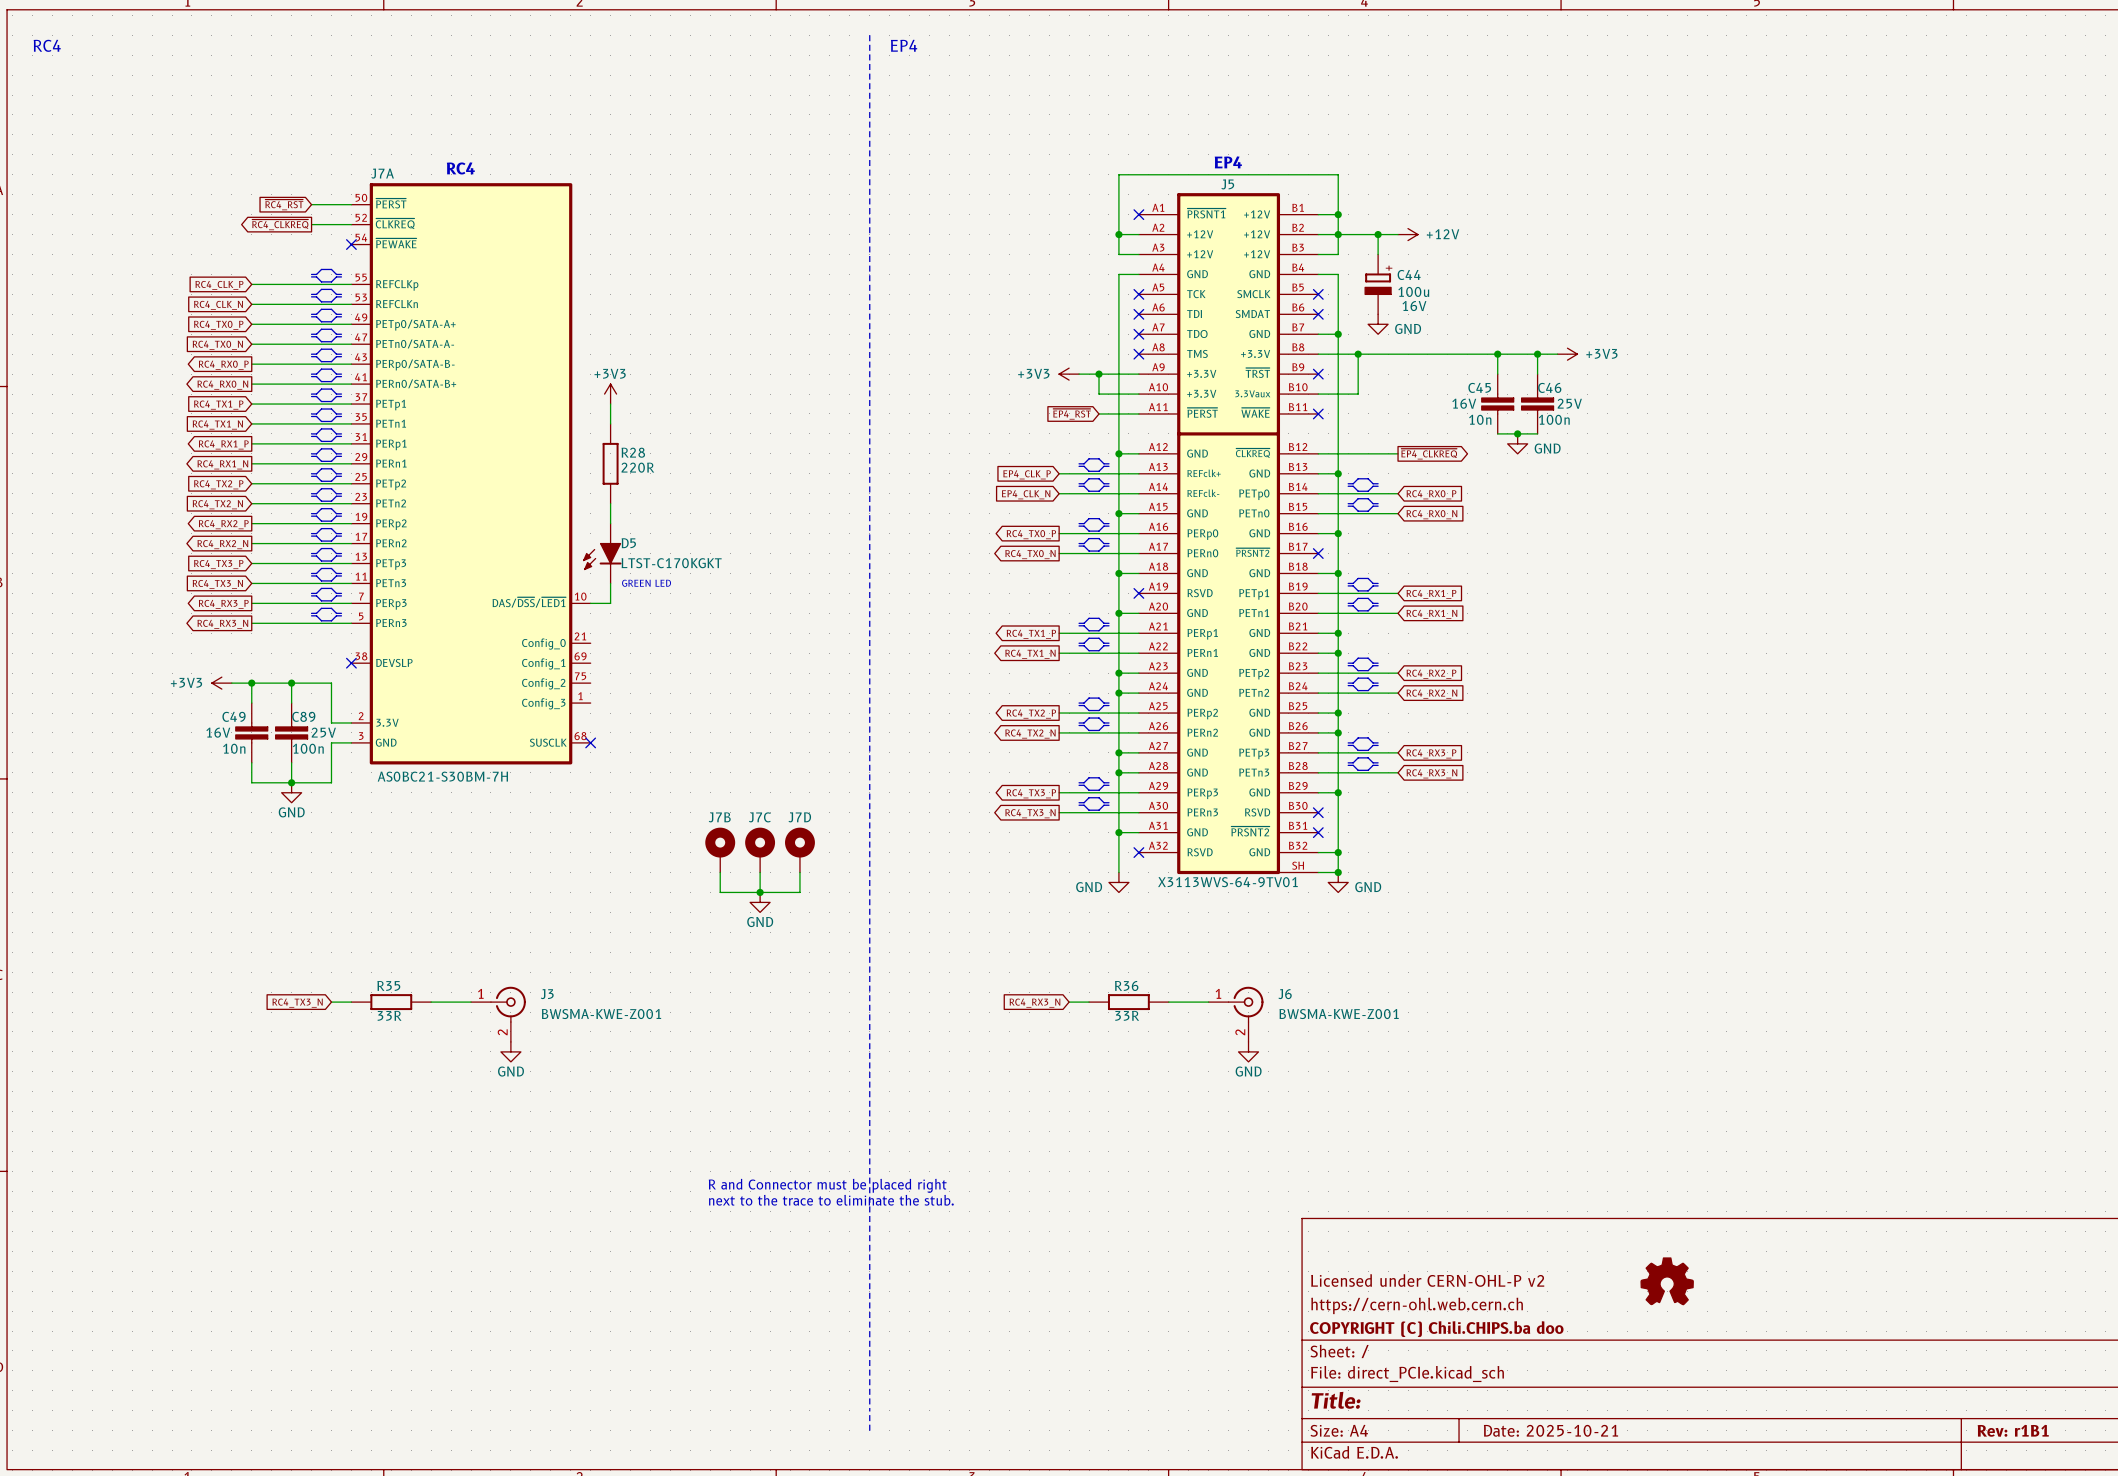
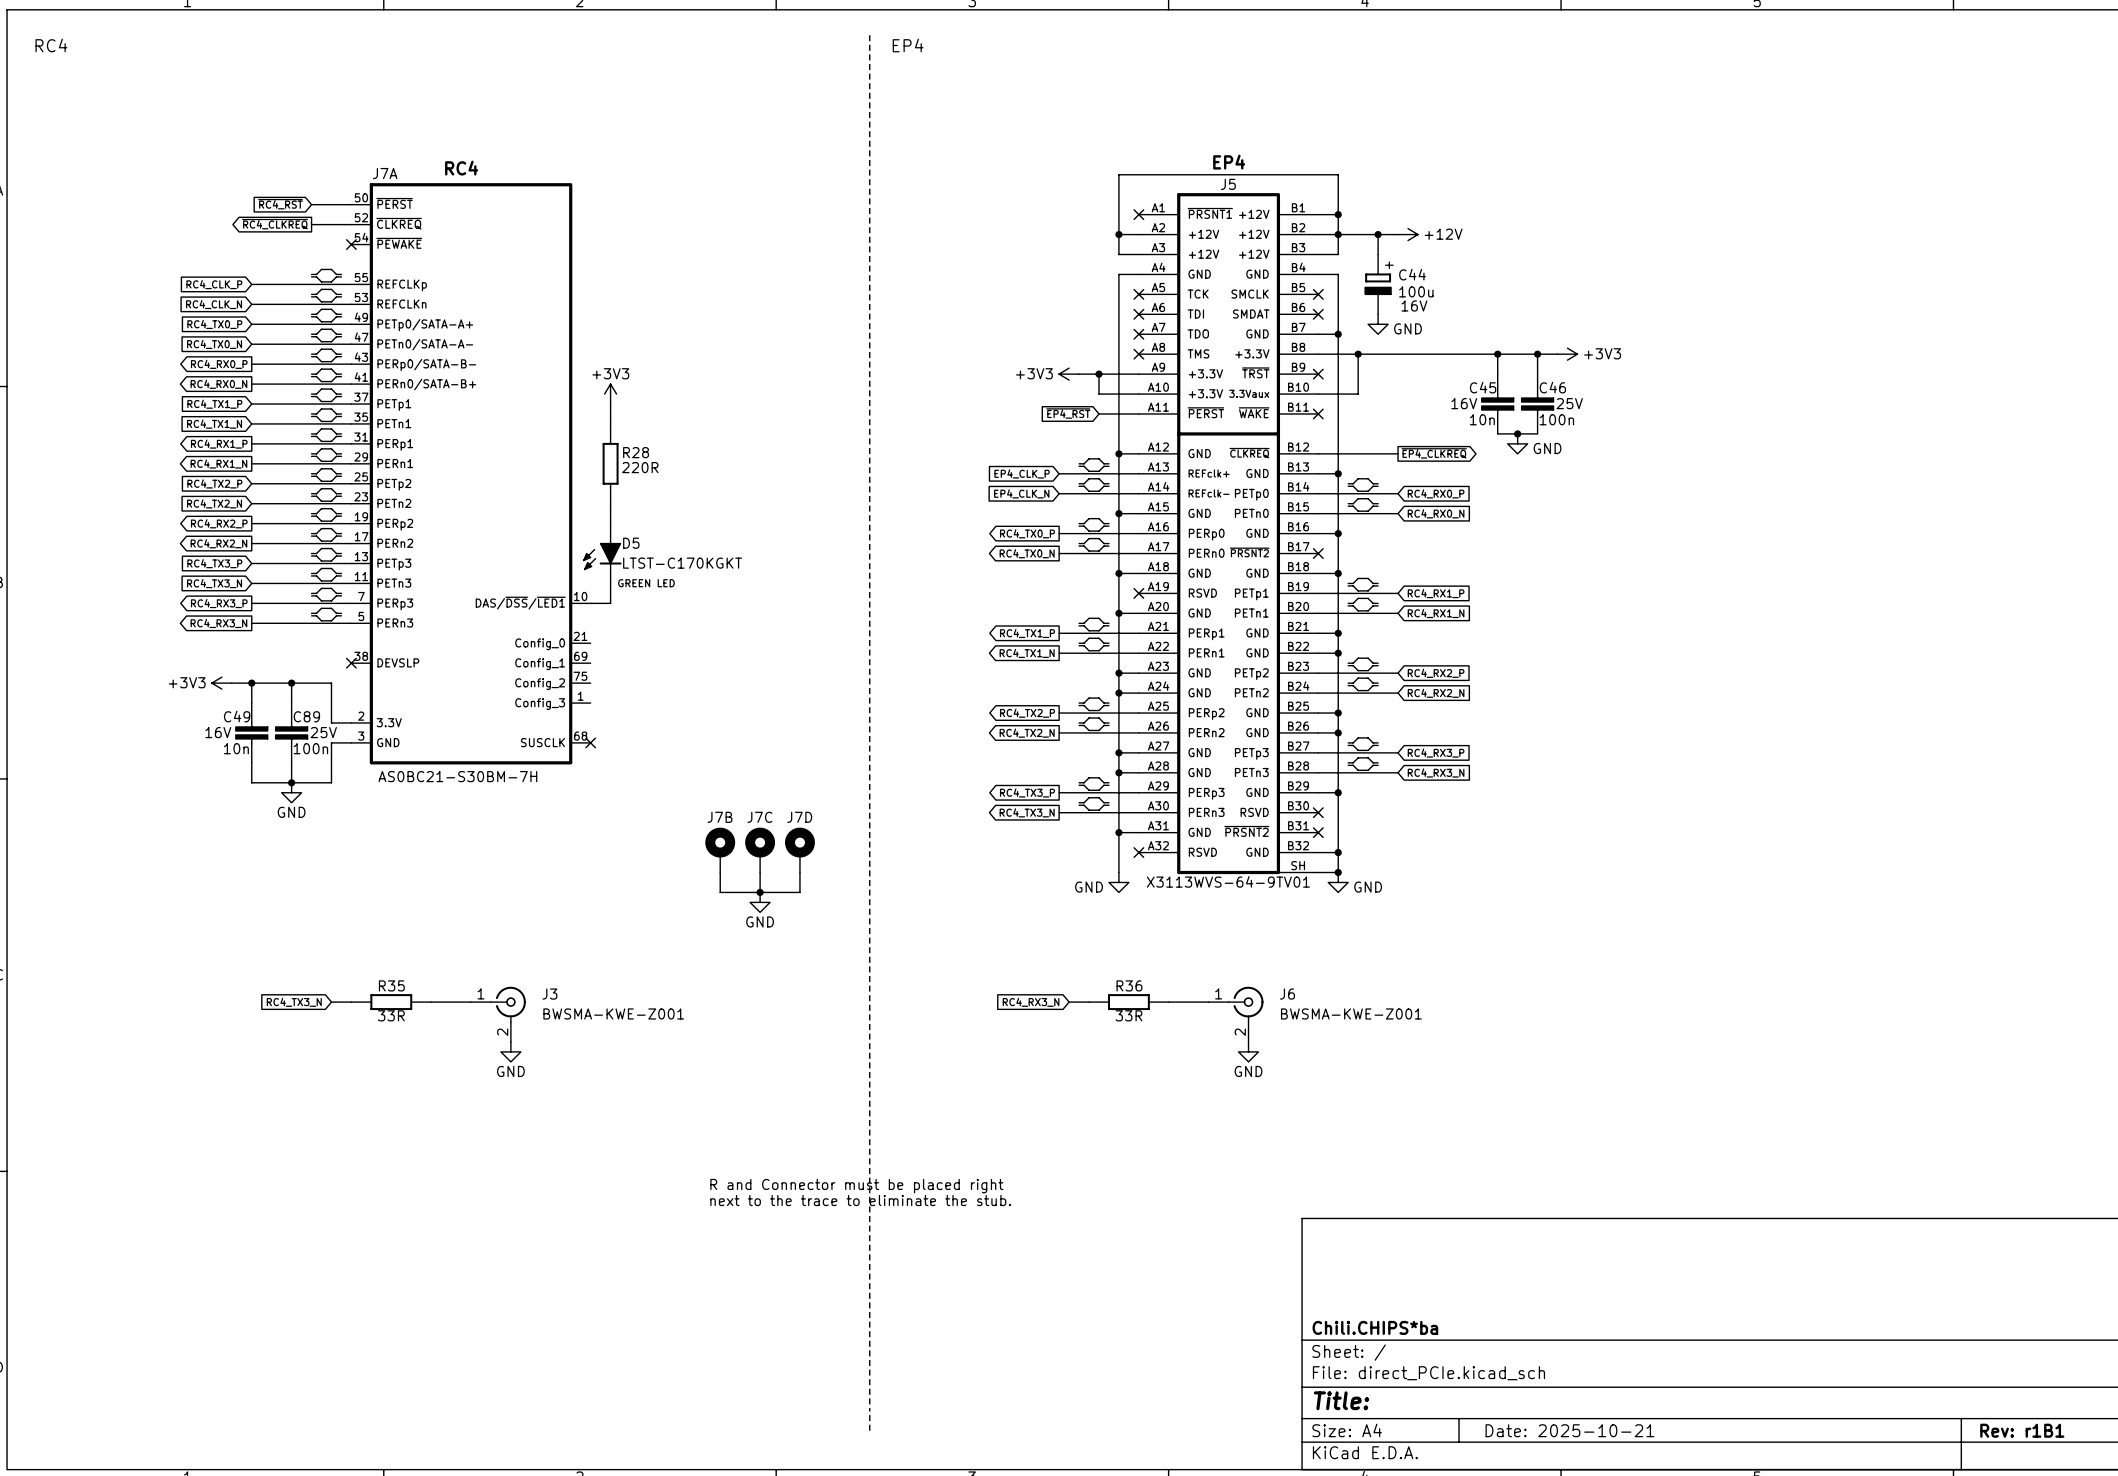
title block: Licensed under CERN-OHL-P v2 (1427, 1280) -> none
part: (1667, 1281) -> none
title block: https://cern-ohl.web.cern.ch (1417, 1305) -> none
title block: COPYRIGHT (C) Chili.CHIPS.ba doo (1436, 1329) -> Chili.CHIPS*ba (1375, 1327)

